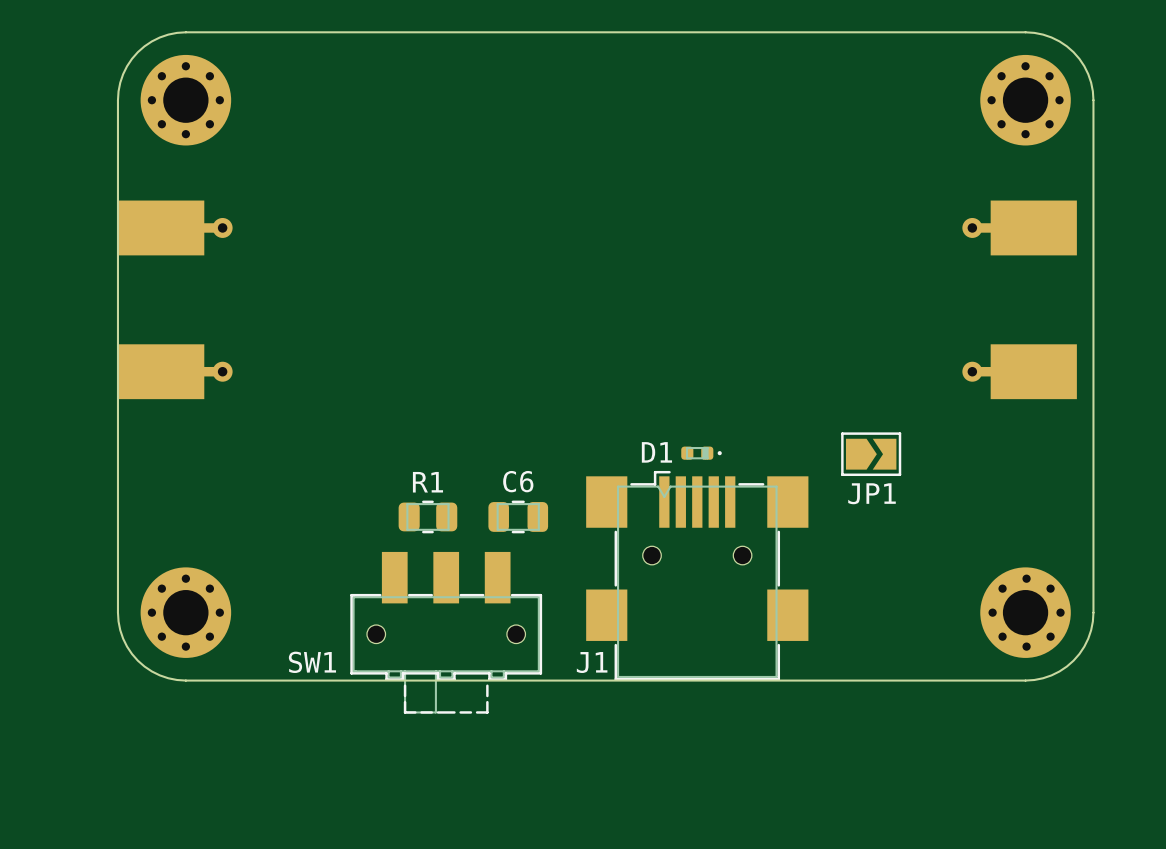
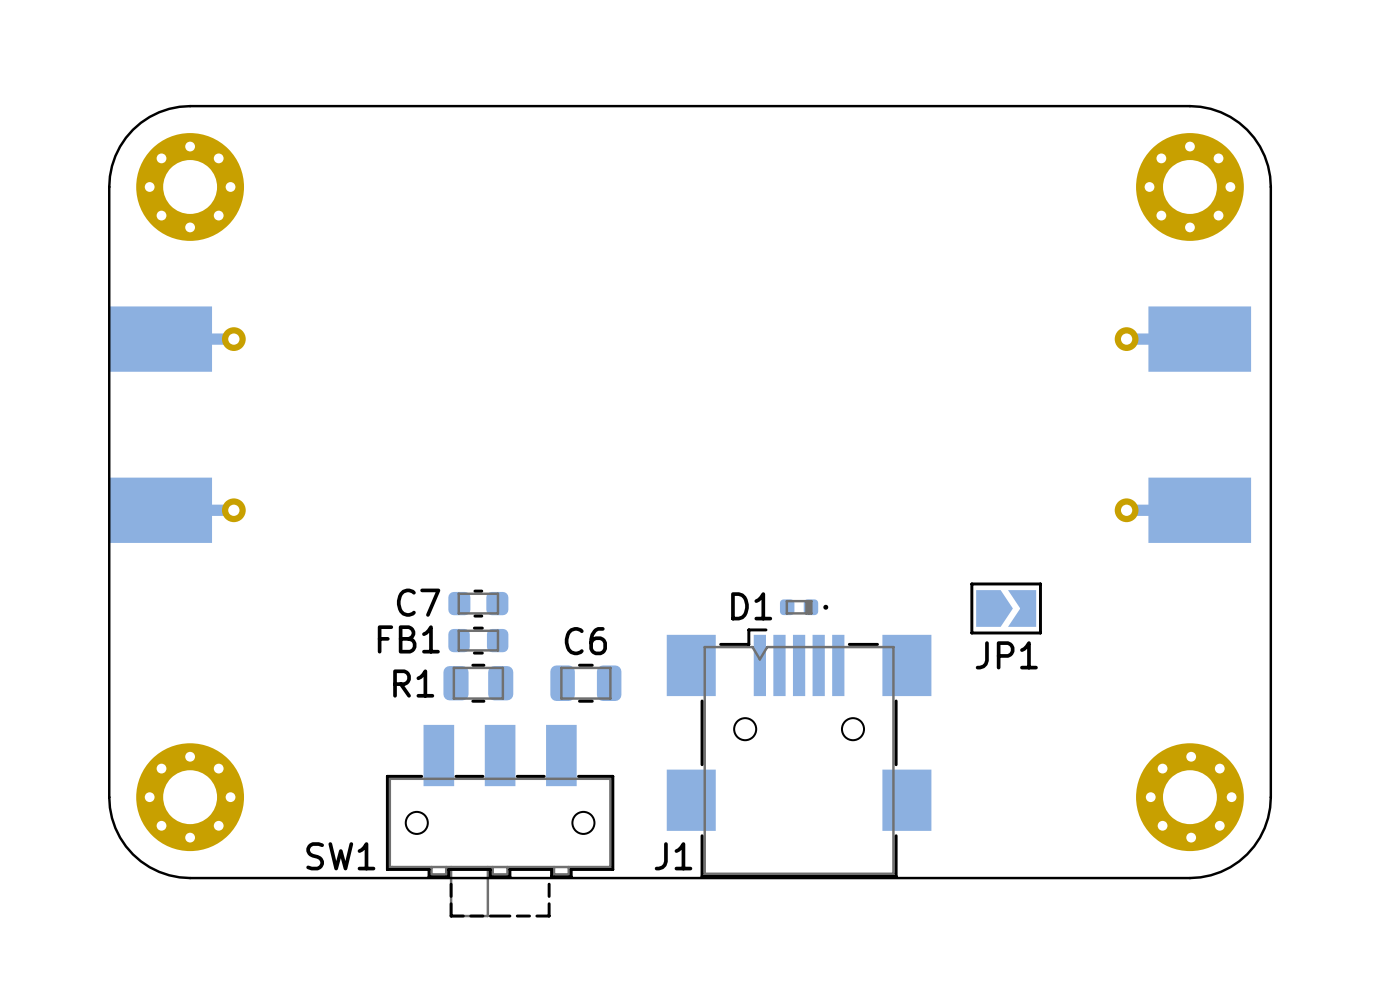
C7: none -> (478, 603)
FB1: none -> (478, 640)
R1 name position: R1 (427, 482) -> R1 (413, 683)

